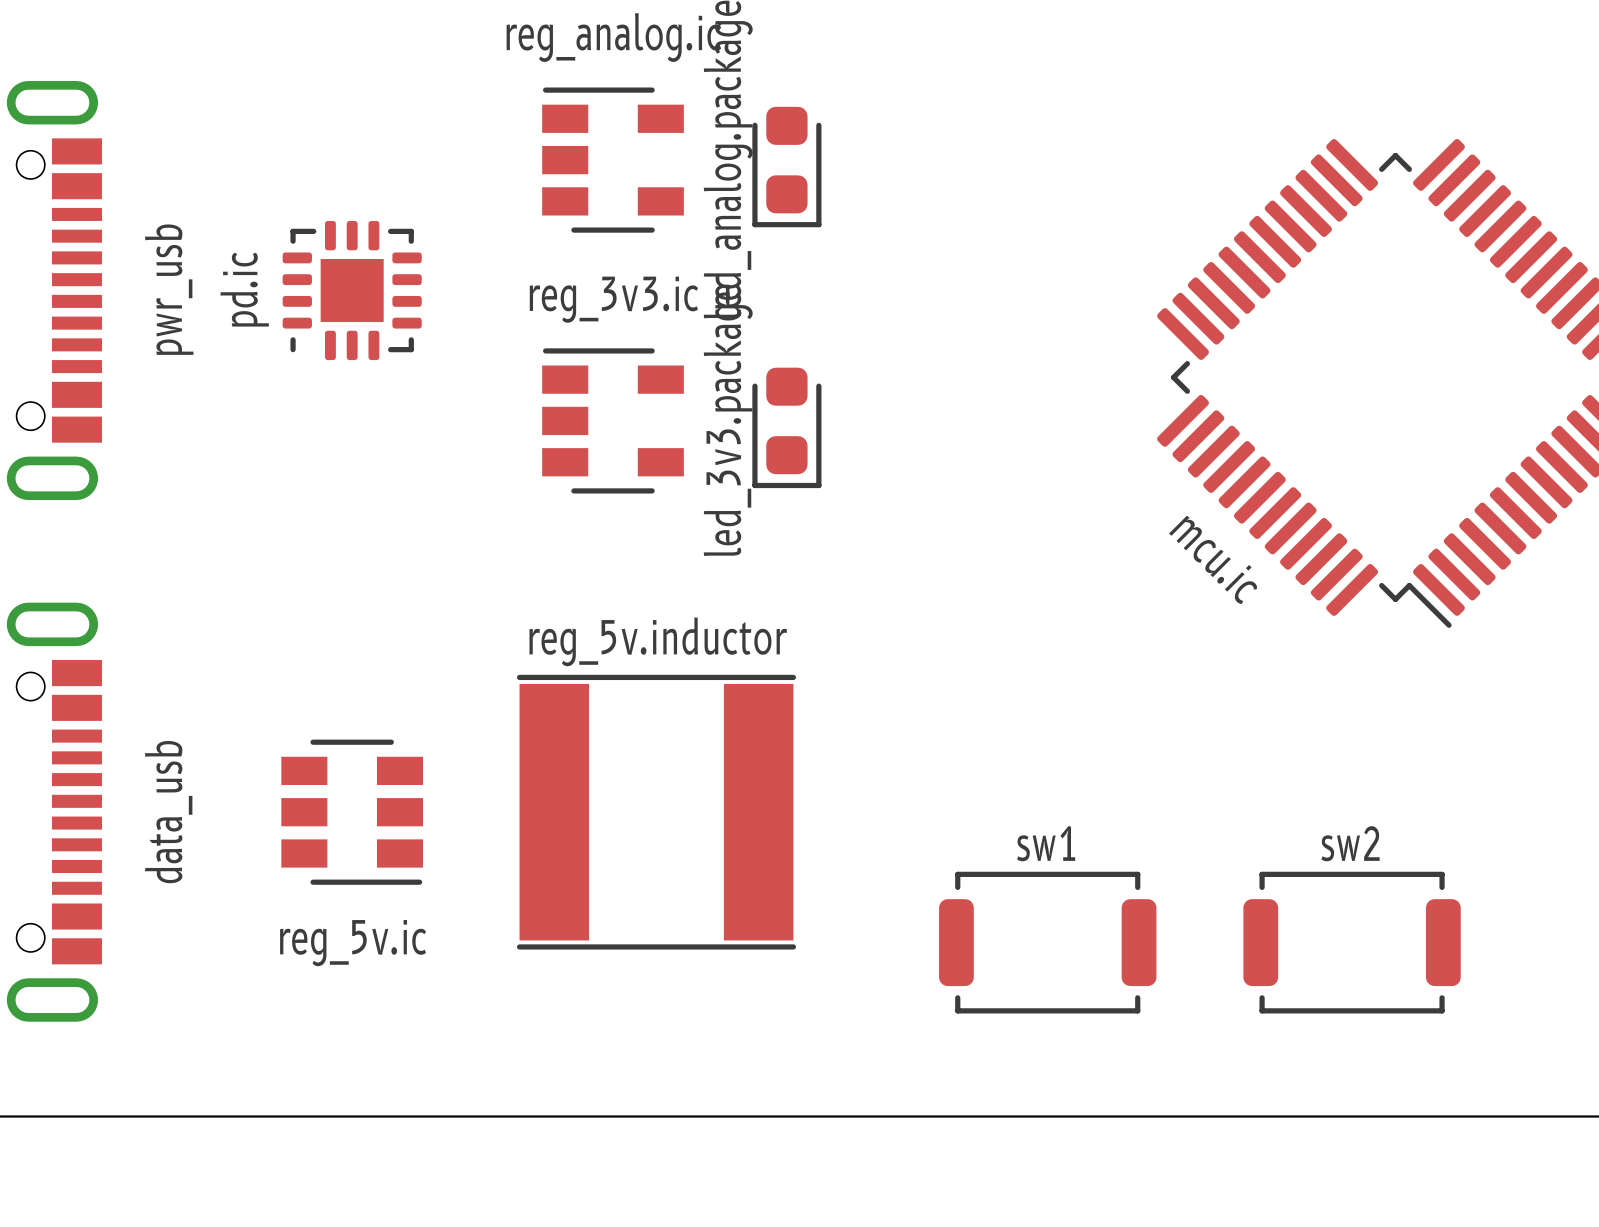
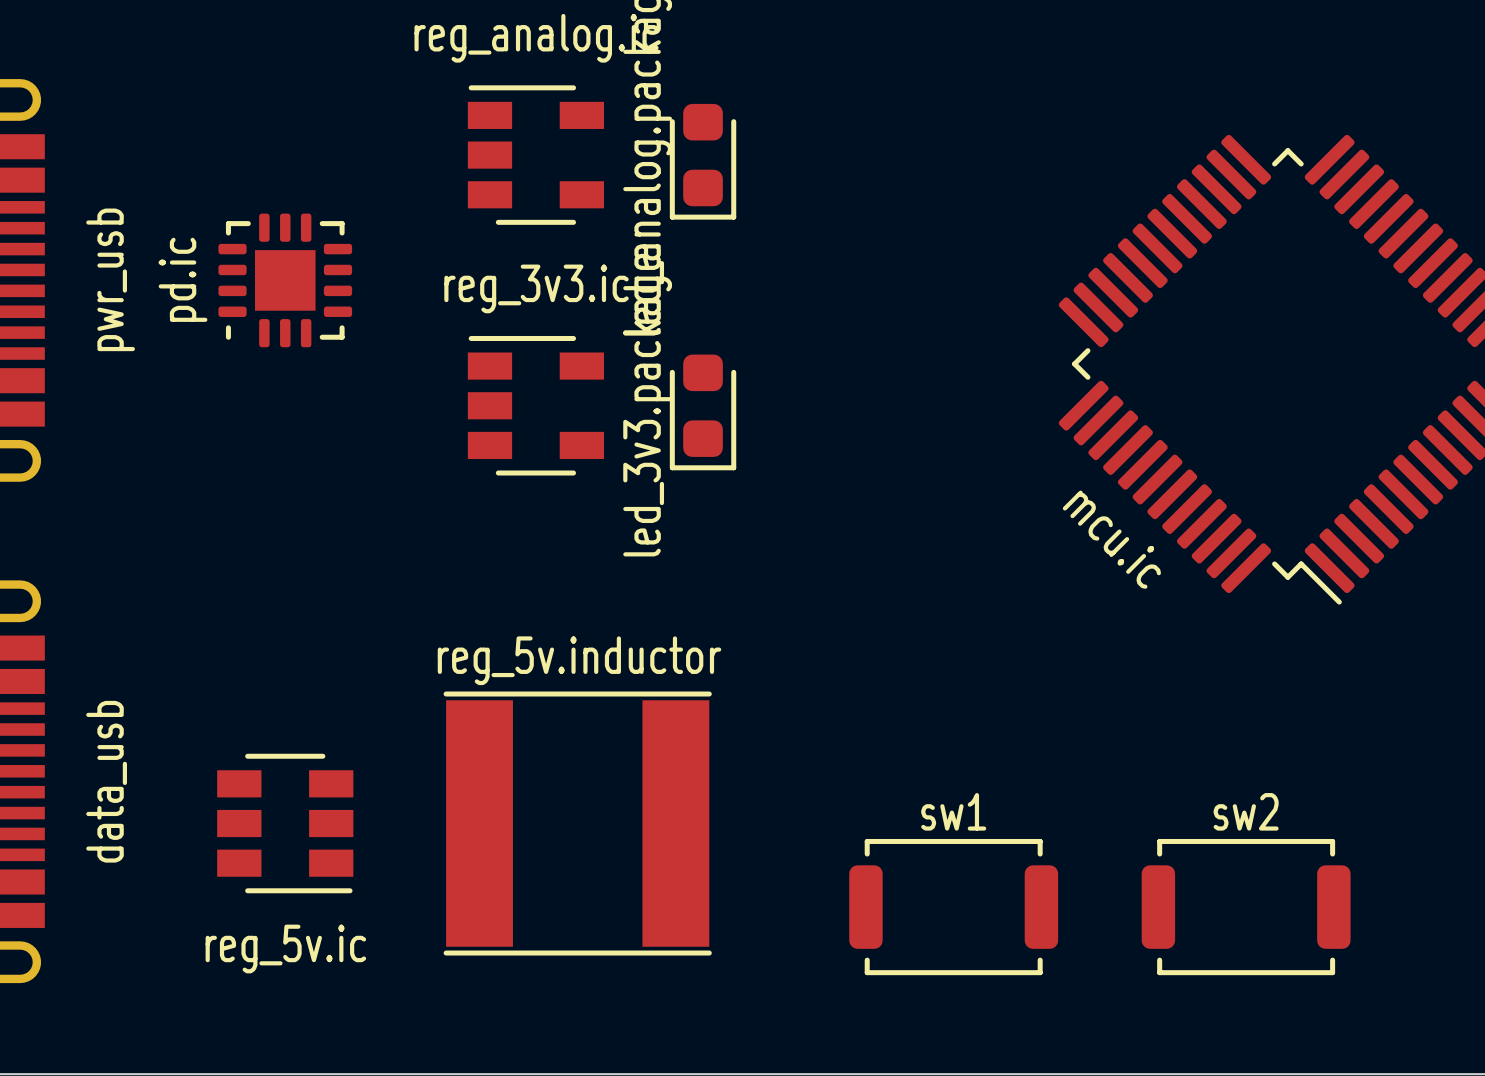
reg_5v.ic position: (352, 812) -> (285, 823)
reg_5v.inductor position: (656, 812) -> (577, 823)

